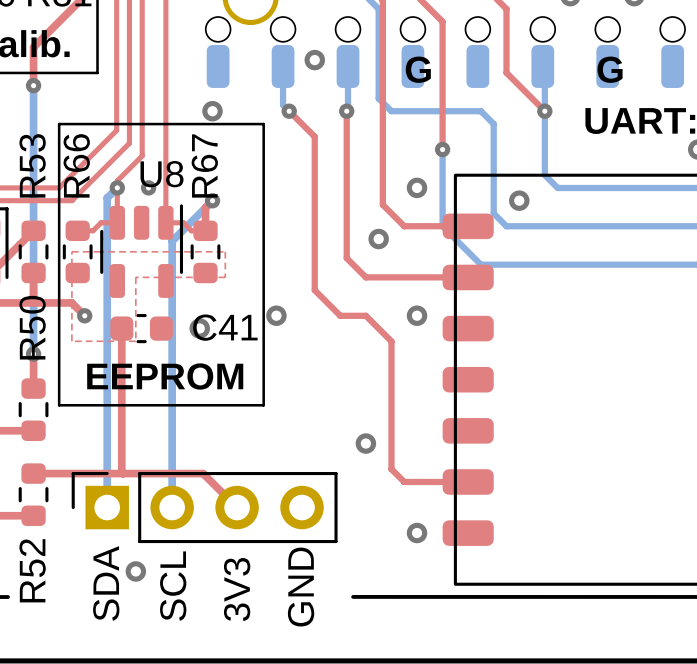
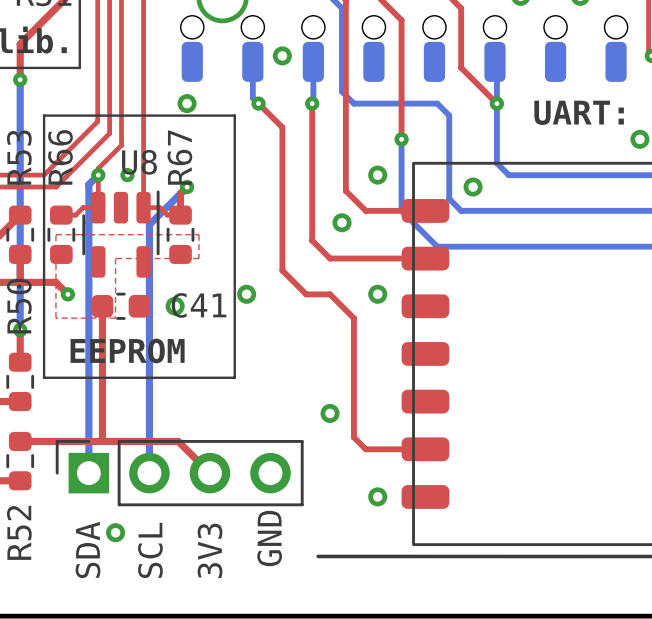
text: G (418, 69) -> none
text: G (610, 69) -> none

